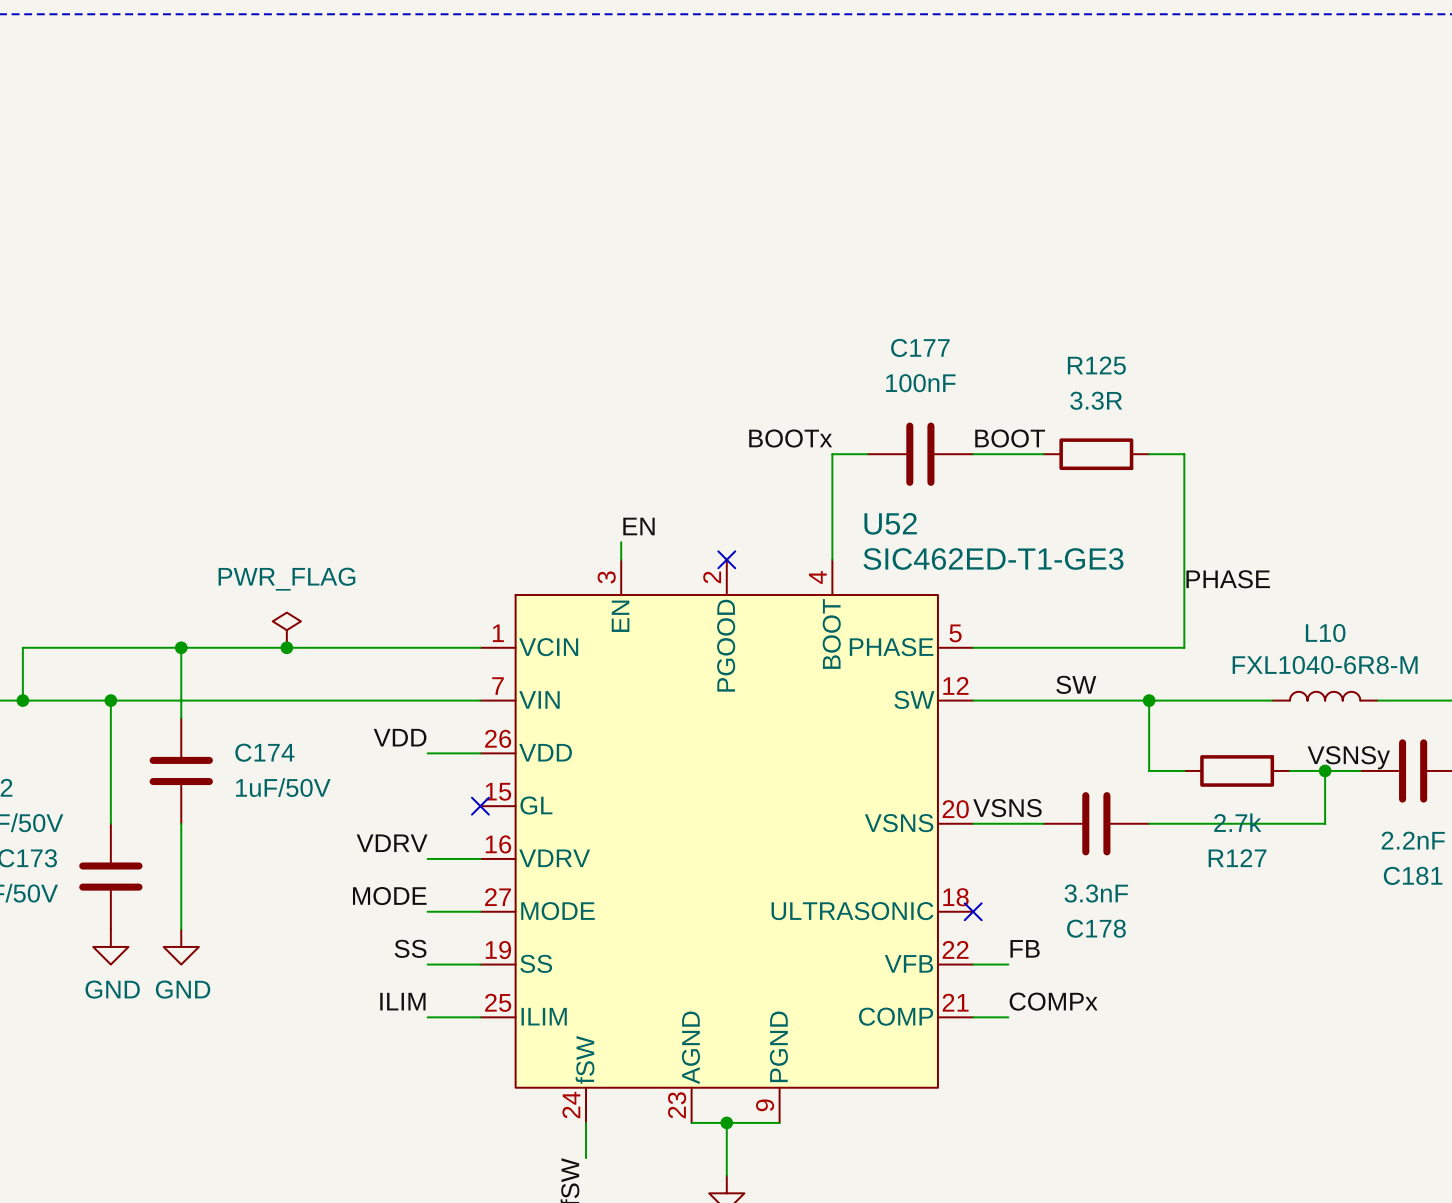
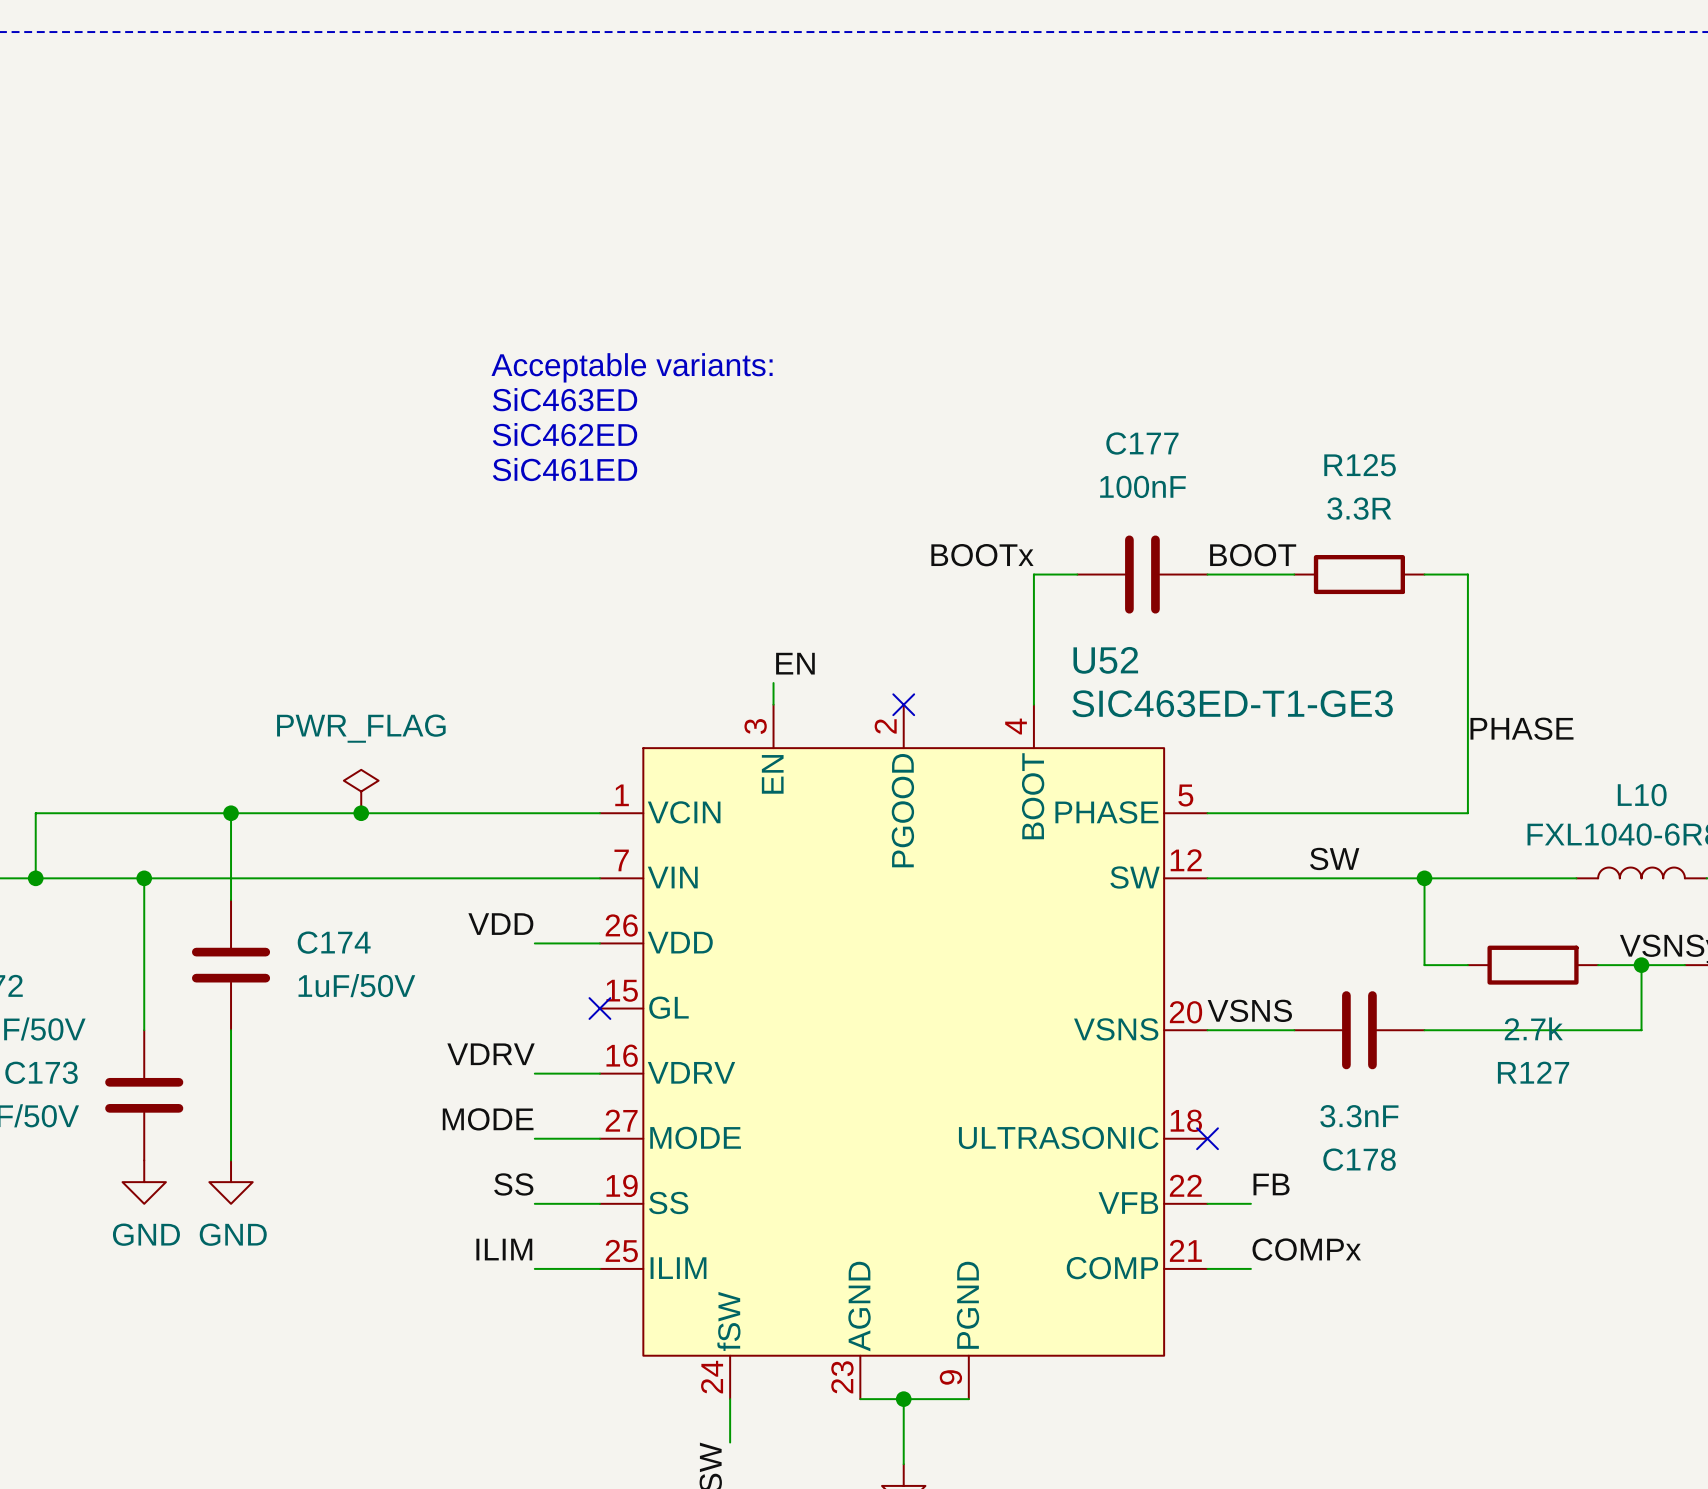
text: none -> Acceptable variants: (632, 367)
text: none -> SiC463ED (565, 399)
text: none -> SiC462ED (565, 434)
text: none -> SiC461ED (565, 469)
U52 value: SIC462ED-T1-GE3 (993, 559) -> SIC463ED-T1-GE3 (1232, 703)

